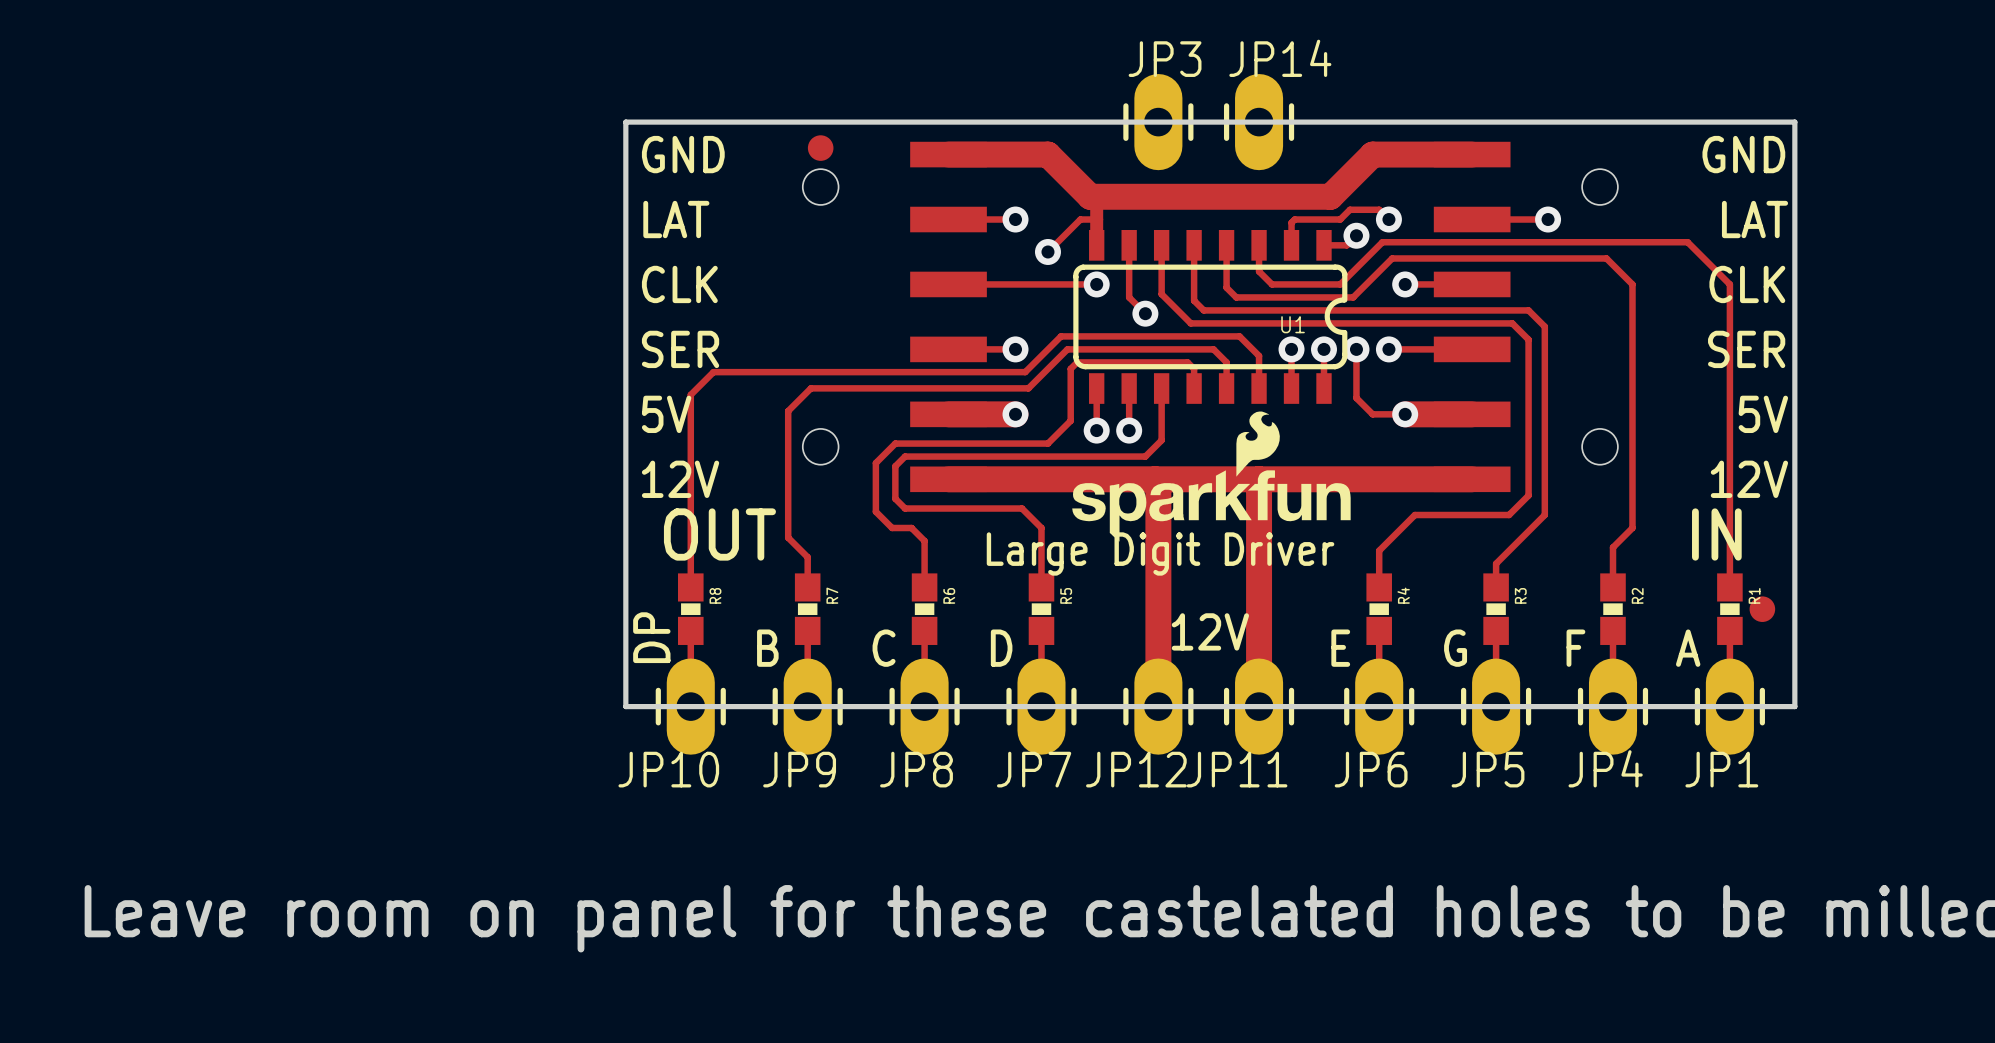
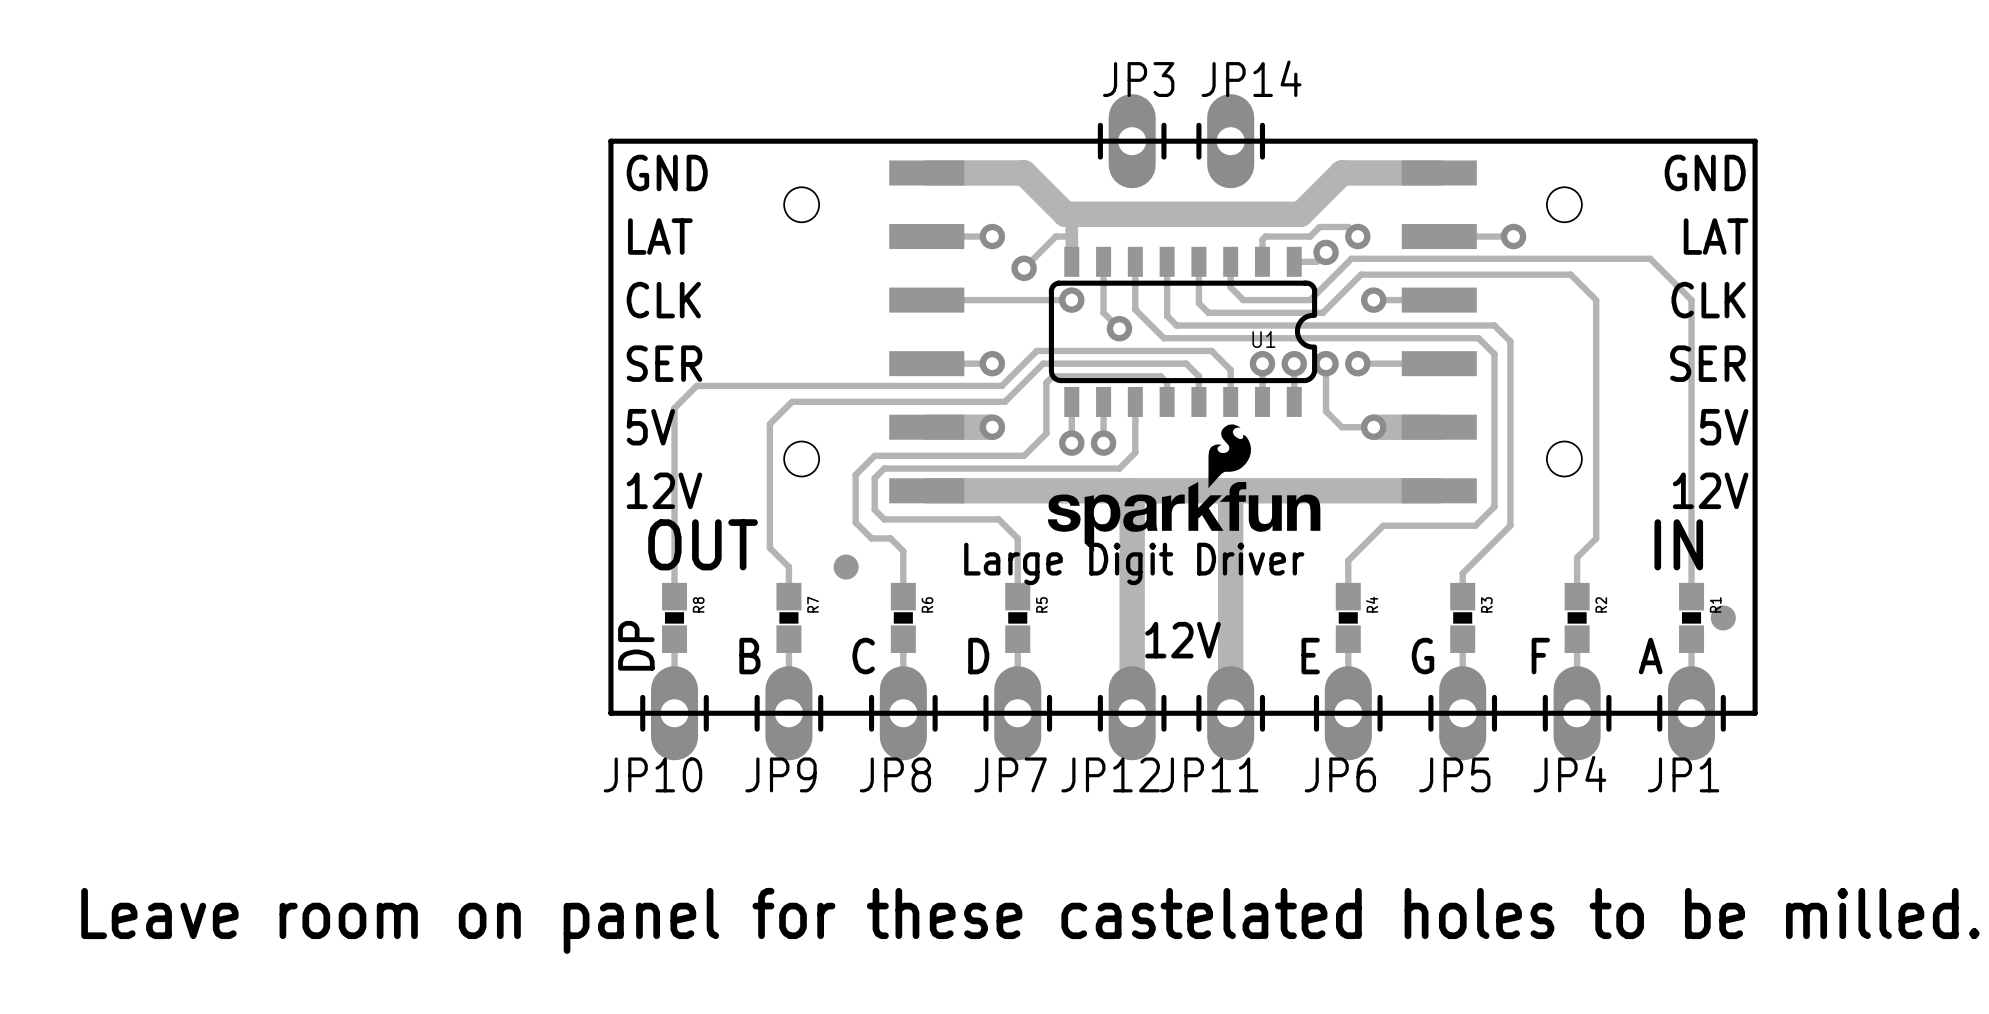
part position: (820, 148) -> (846, 567)

